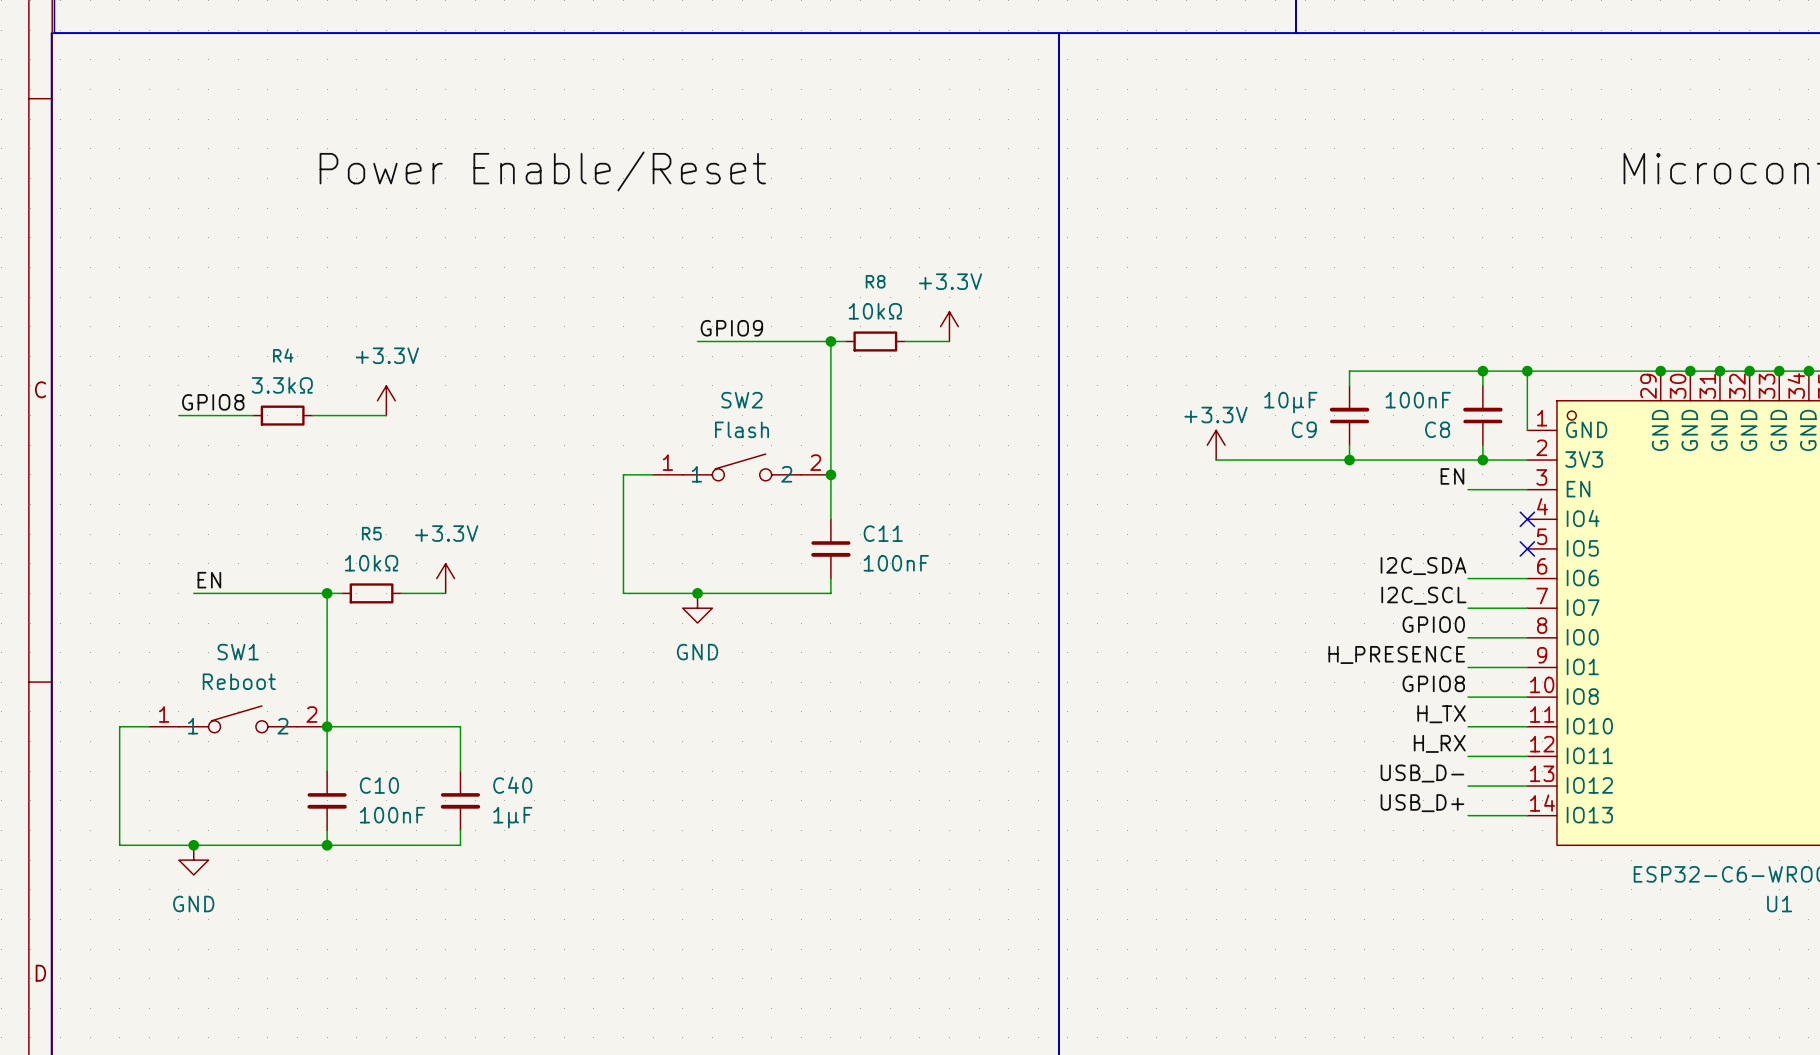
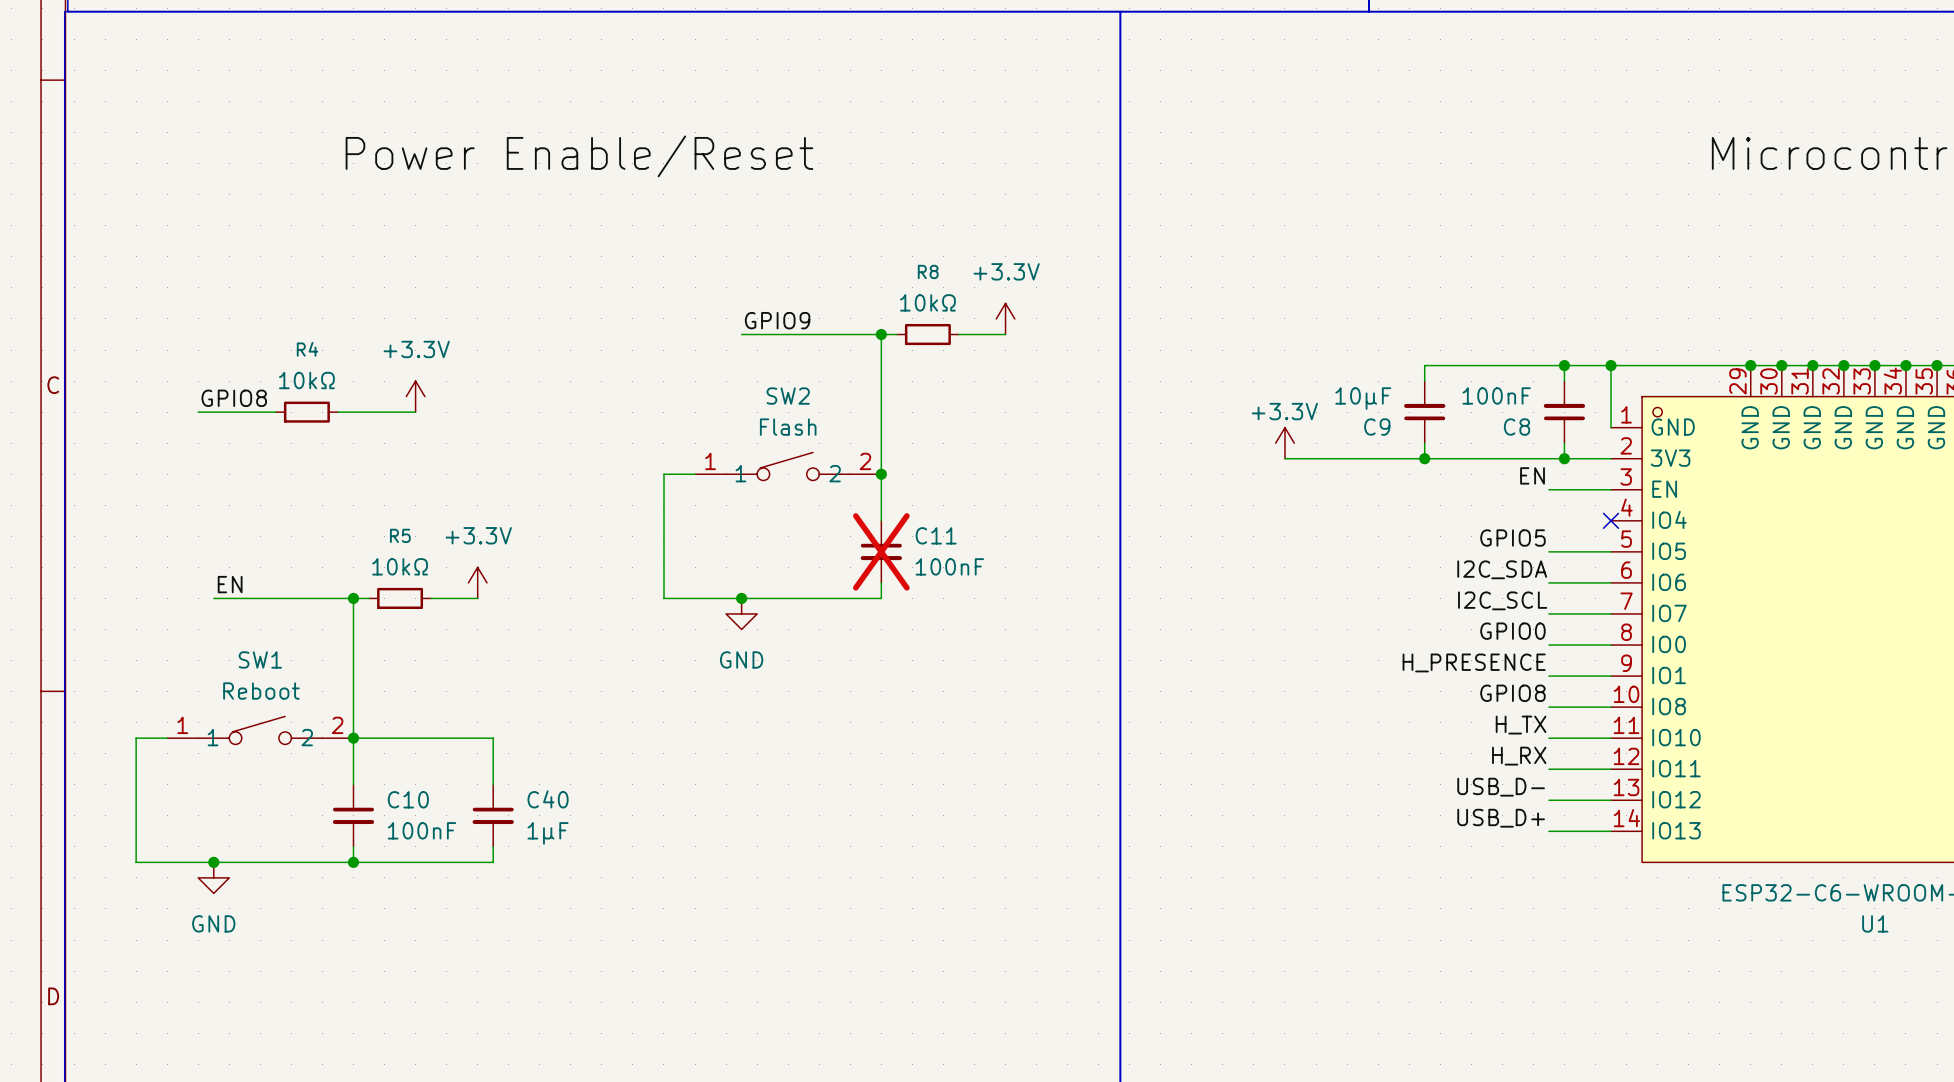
R4 value: 3.3kΩ (282, 385) -> 10kΩ (306, 380)
label: none -> GPIO5 (1512, 538)
C11 do-not-place cross: none -> (881, 551)
wire: none -> (1548, 551) (1611, 551)
no-connect mark: (1527, 548) -> none

